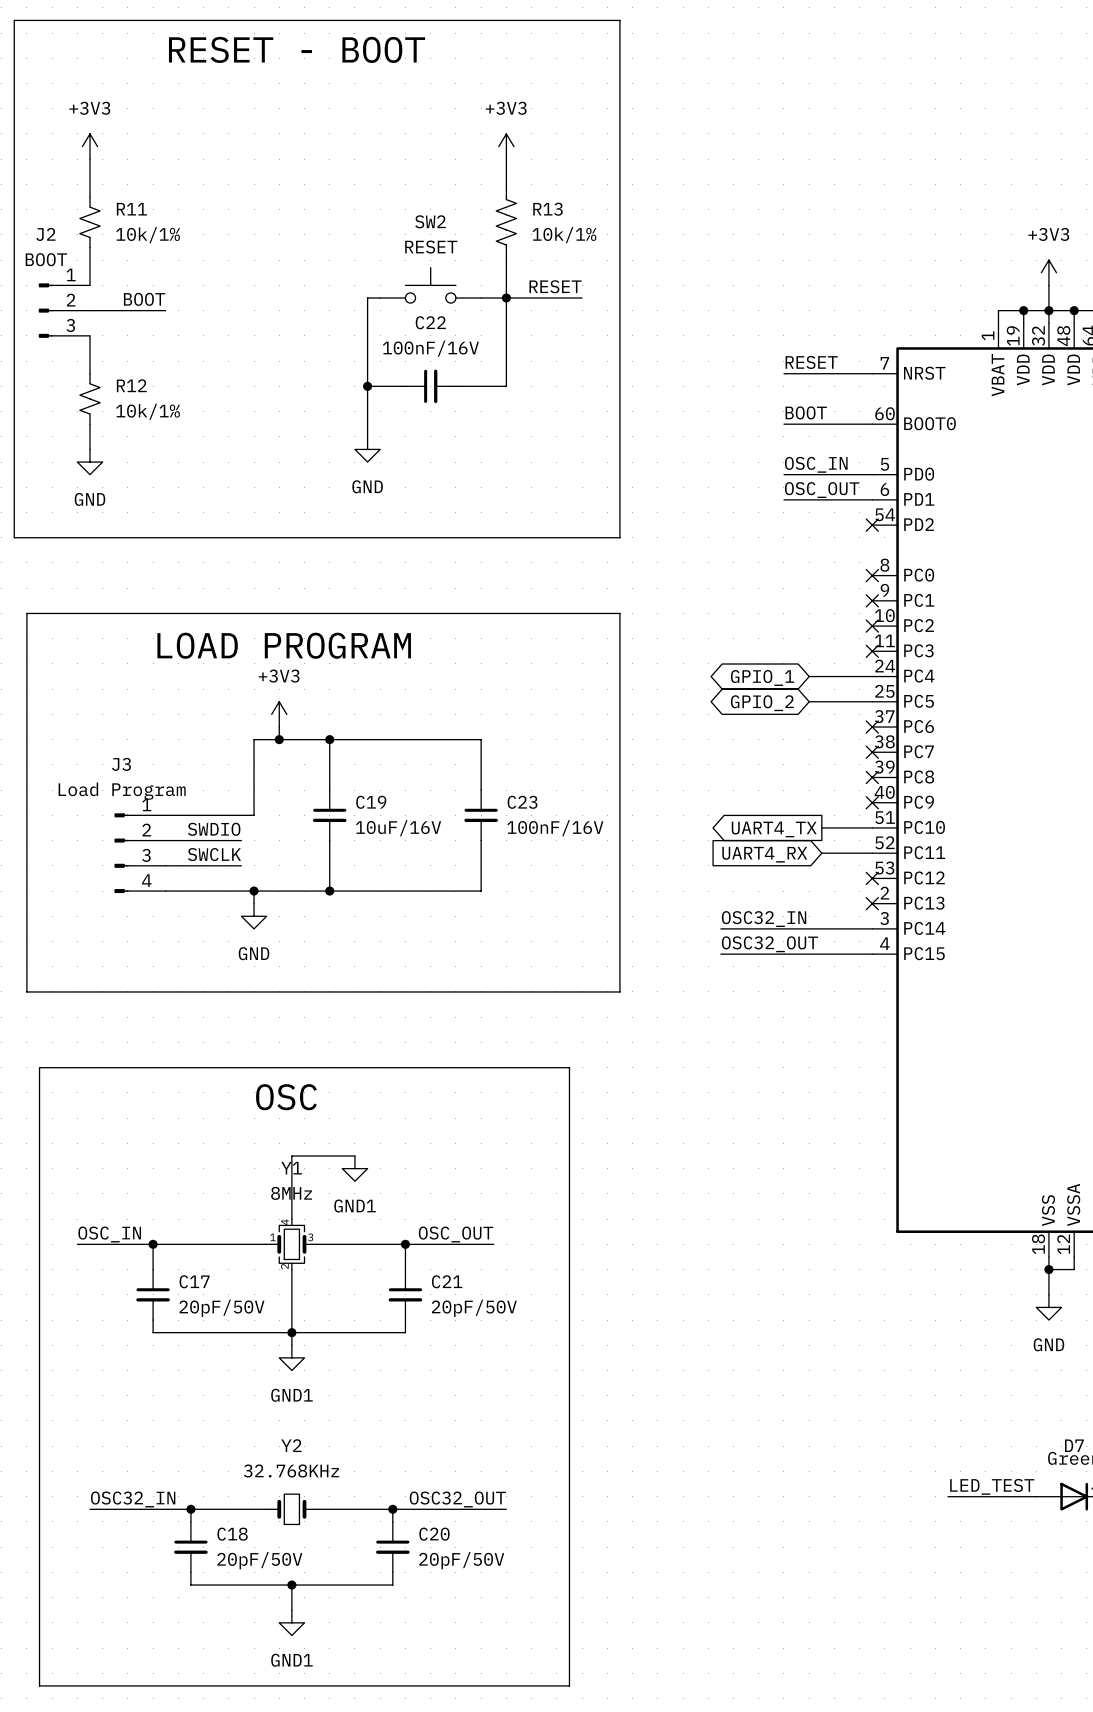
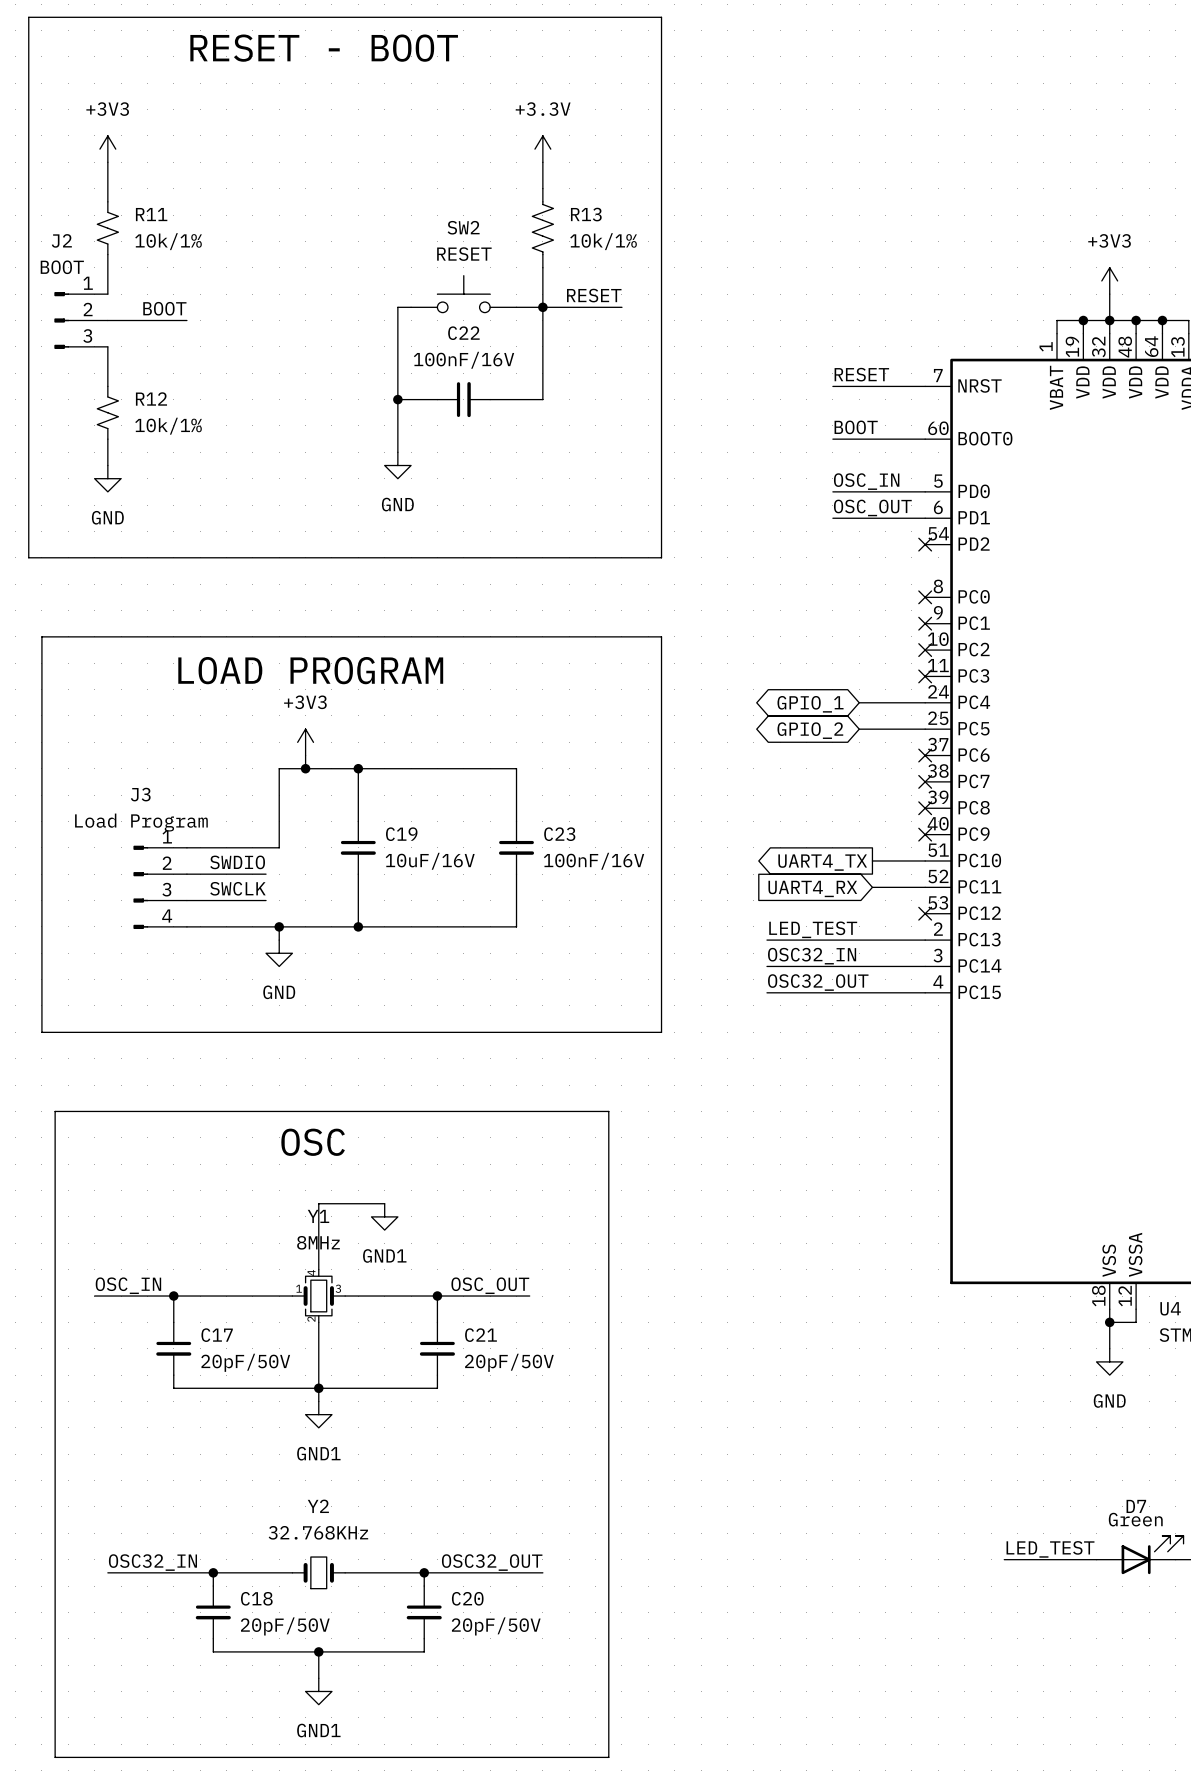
power symbol: +3V3 (506, 146) -> +3.3V (542, 149)
label: none -> LED_TEST (813, 929)
wire: none -> (766, 940) (925, 940)
no-connect mark: (872, 903) -> none

